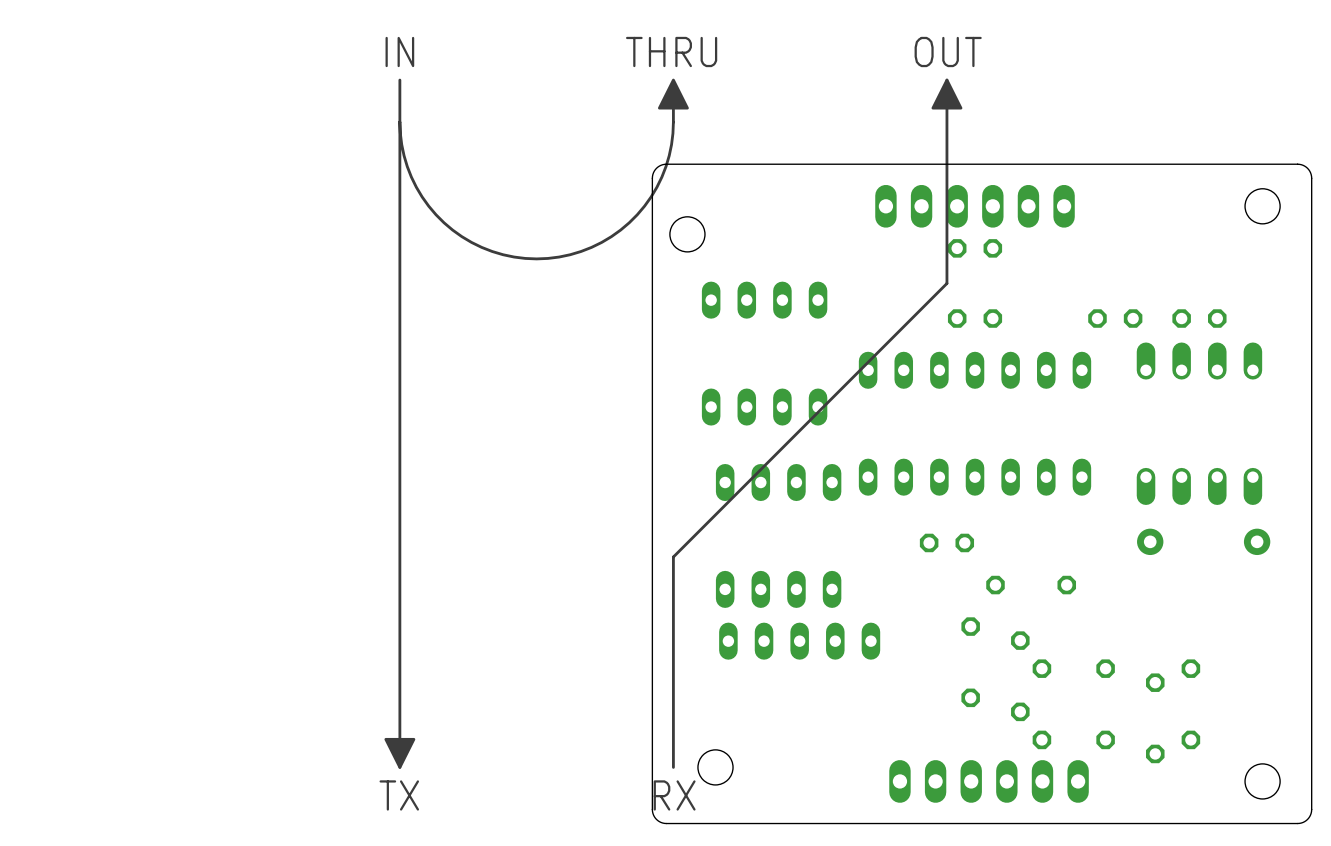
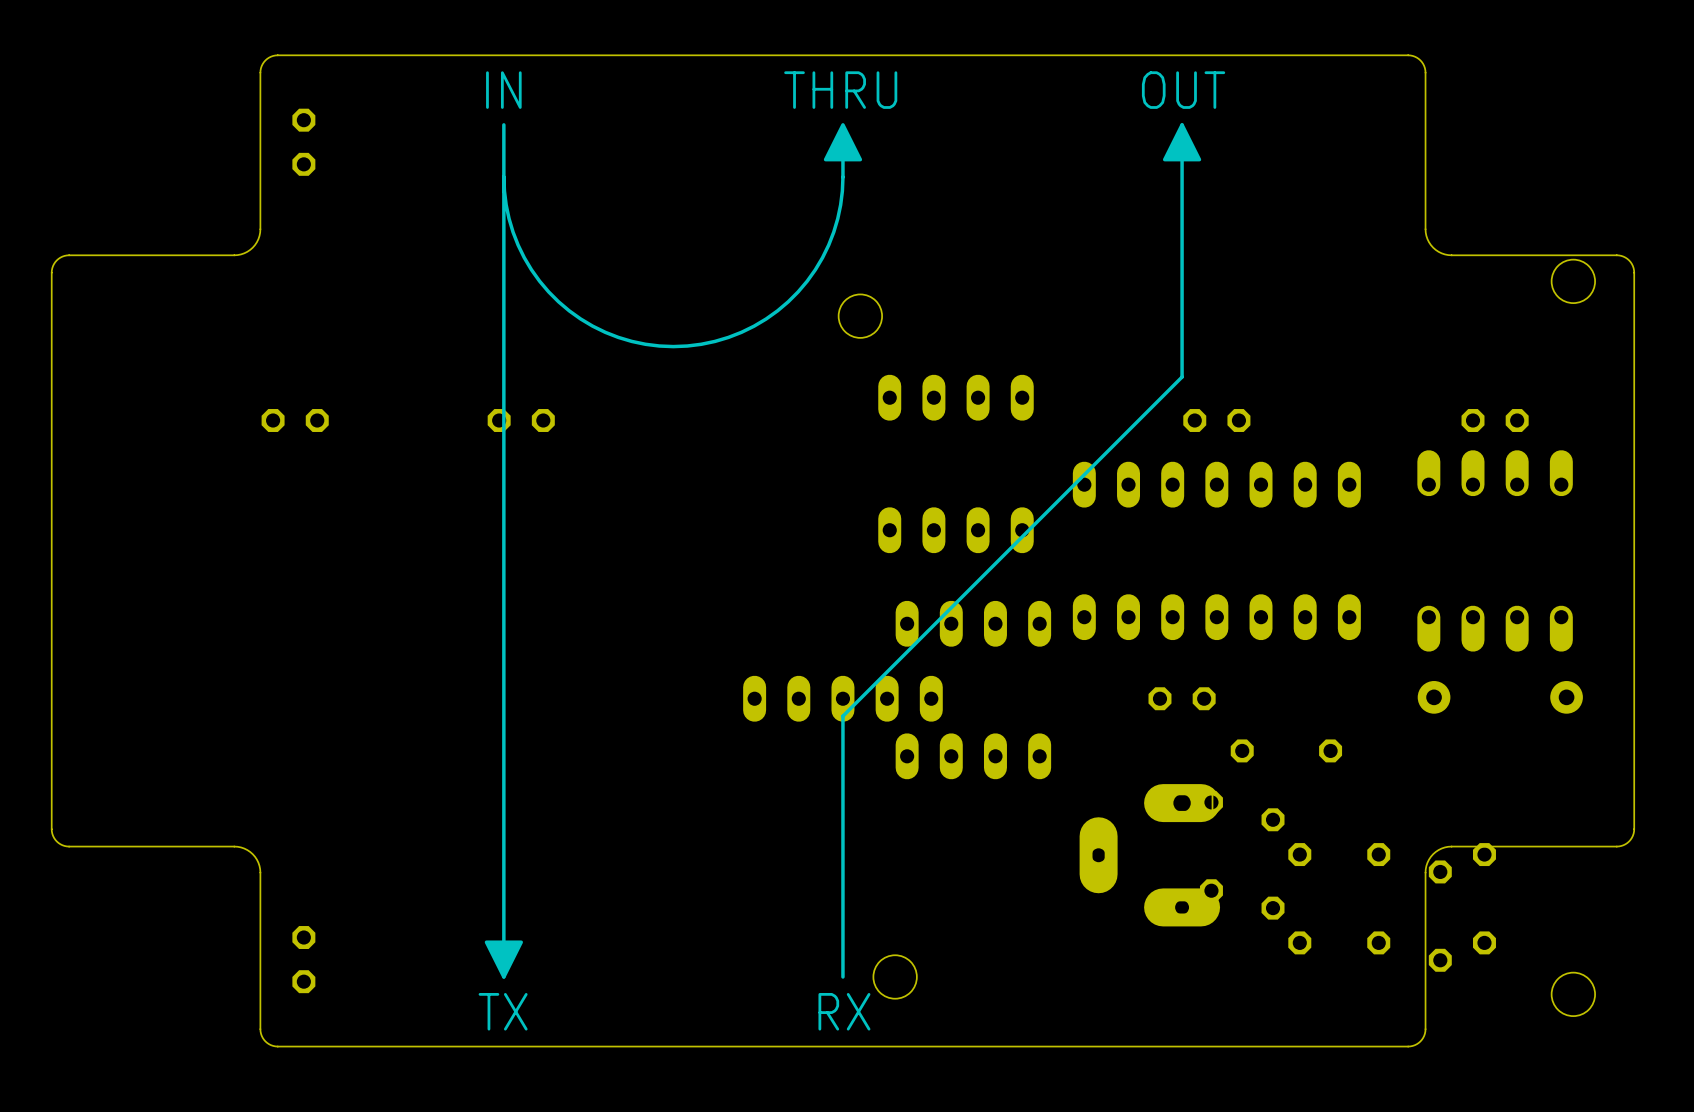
part: none -> (303, 142)
board edge: (1311, 199) (1310, 172) (1306, 167) (1297, 164) (666, 164) (656, 168) (652, 178) (652, 809) (656, 819) (666, 823) -> (1634, 272) (1630, 262) (1619, 255) (1451, 255) (1441, 253) (1433, 247) (1427, 239) (1425, 229) (1425, 70) (1418, 58) (1408, 55) (275, 55) (265, 60) (260, 70) (260, 229) (258, 239) (252, 247) (244, 253) (234, 255) (69, 255) (56, 260) (51, 272) (51, 829) (56, 841) (69, 846) (234, 846) (244, 848) (252, 854) (258, 862) (260, 872) (260, 1031) (263, 1039) (273, 1045) (834, 1046)
part: (975, 206) -> none
part: (975, 248) -> none
part: none -> (295, 420)
part: none -> (521, 420)
part: (1115, 318) -> none
part position: (799, 641) -> (842, 698)
board edge: (1311, 648) (1311, 809) (1307, 819) (1297, 823) (1129, 823) -> (1634, 829) (1630, 839) (1619, 846) (1451, 846) (1441, 848) (1433, 854) (1427, 862) (1425, 872) (1425, 1031) (1418, 1042) (1408, 1046)
part: none -> (1149, 855)
part: none -> (303, 959)
part: (989, 781) -> none

